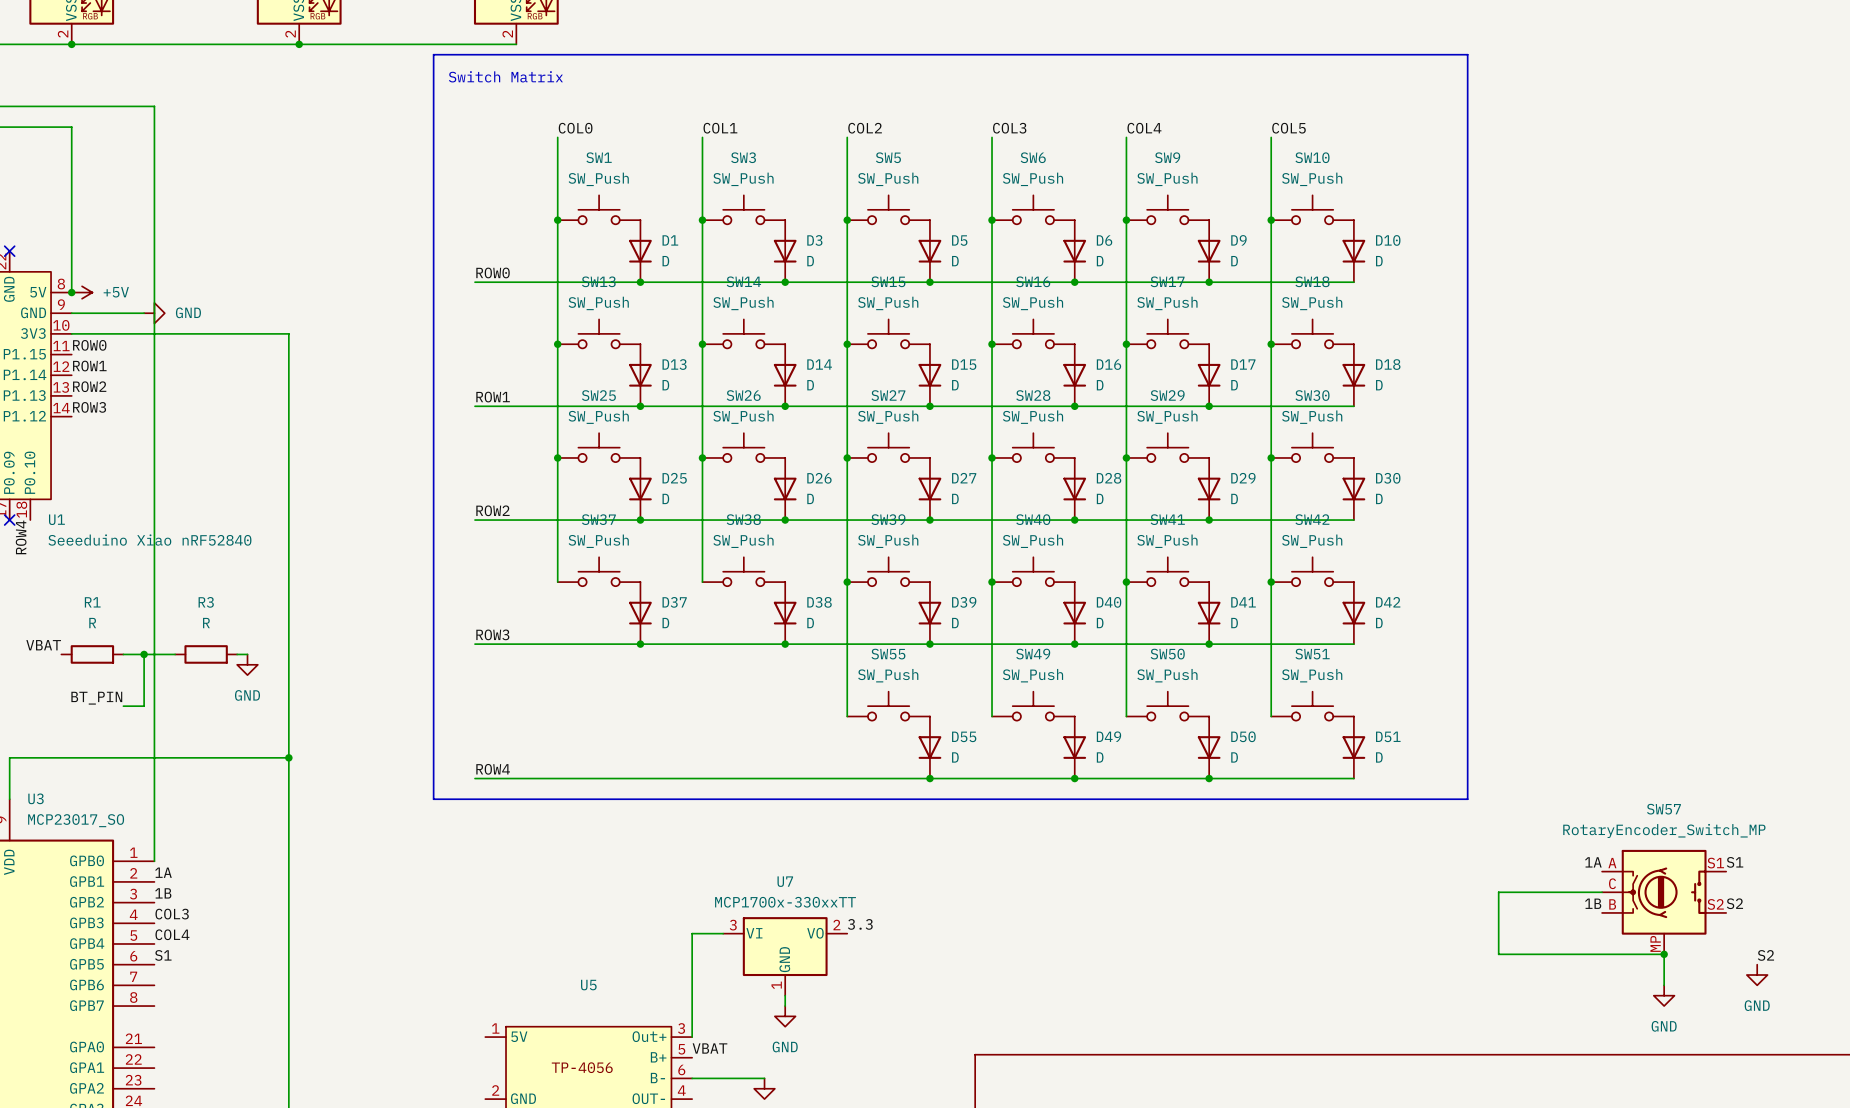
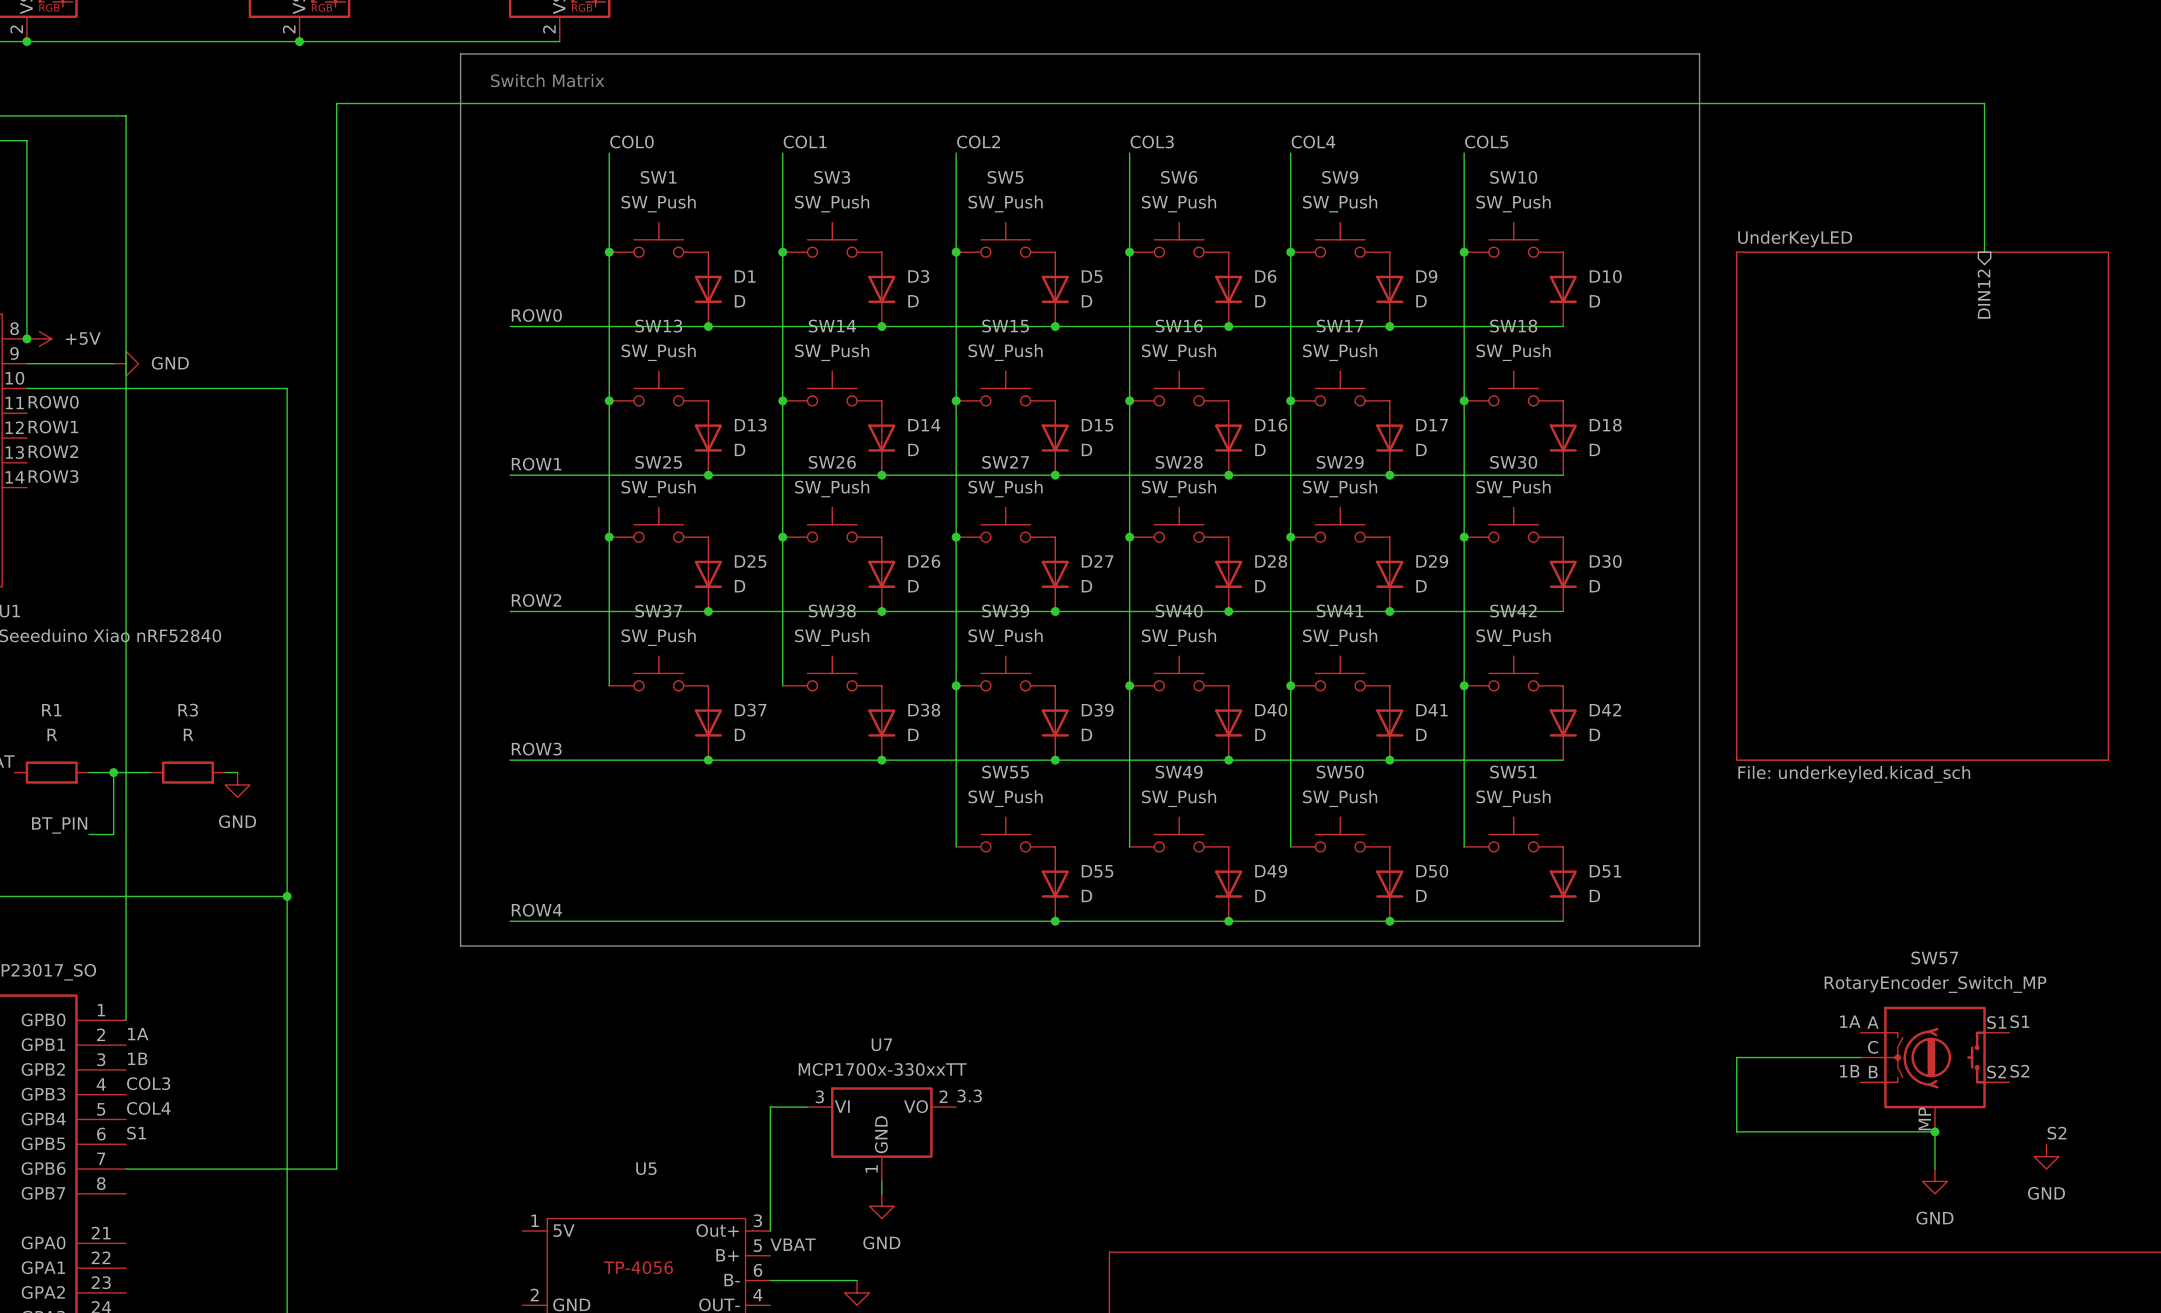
wire: none -> (1984, 252) (1984, 103) (336, 103) (336, 1169) (126, 1169)
sheet pin: none -> DIN12 (1983, 294)
sheet UnderKeyLED: none -> File: underkeyled.kicad_sch (1922, 506)

